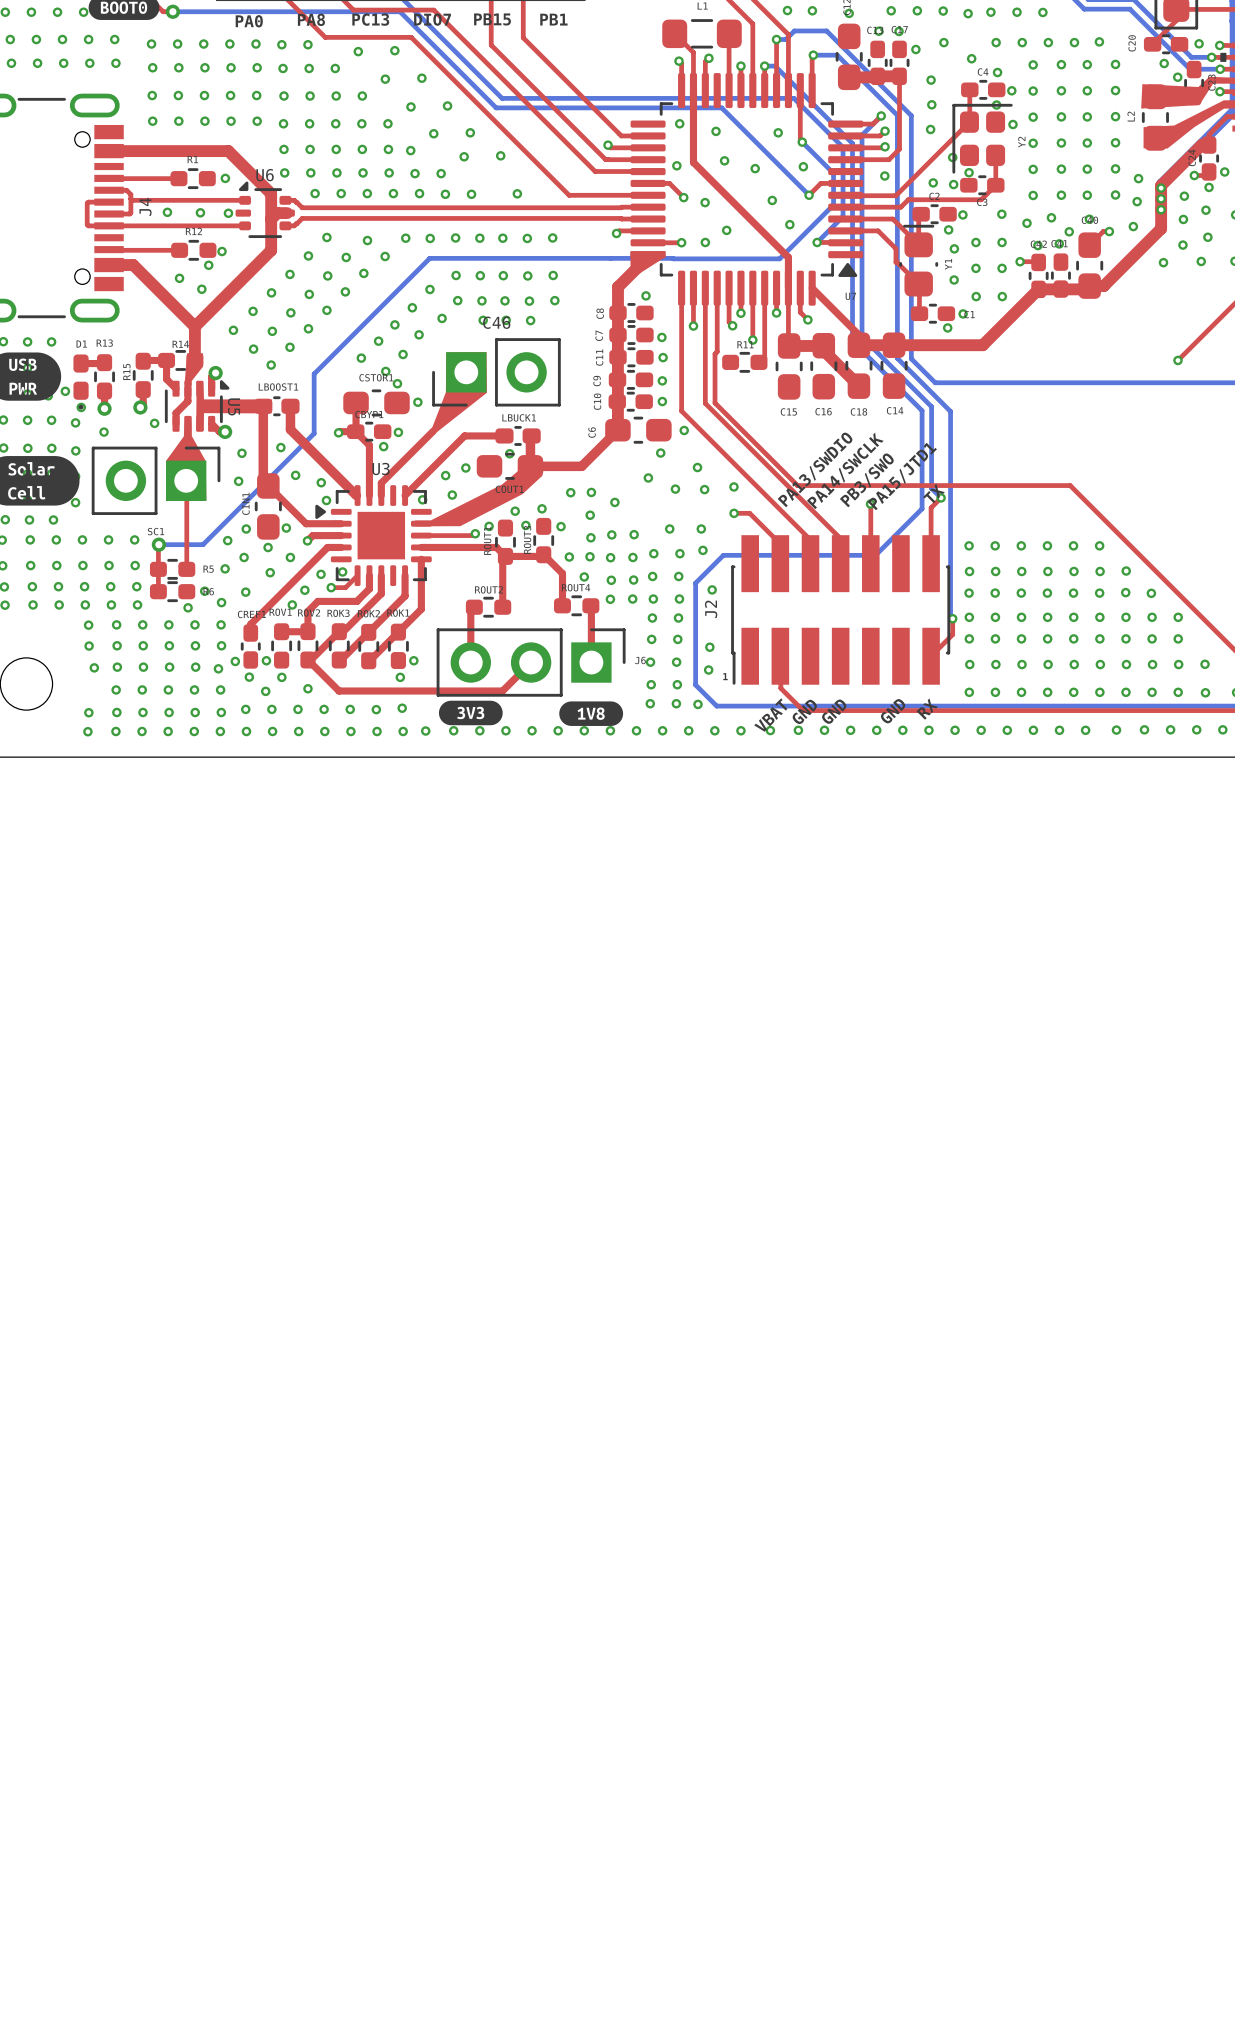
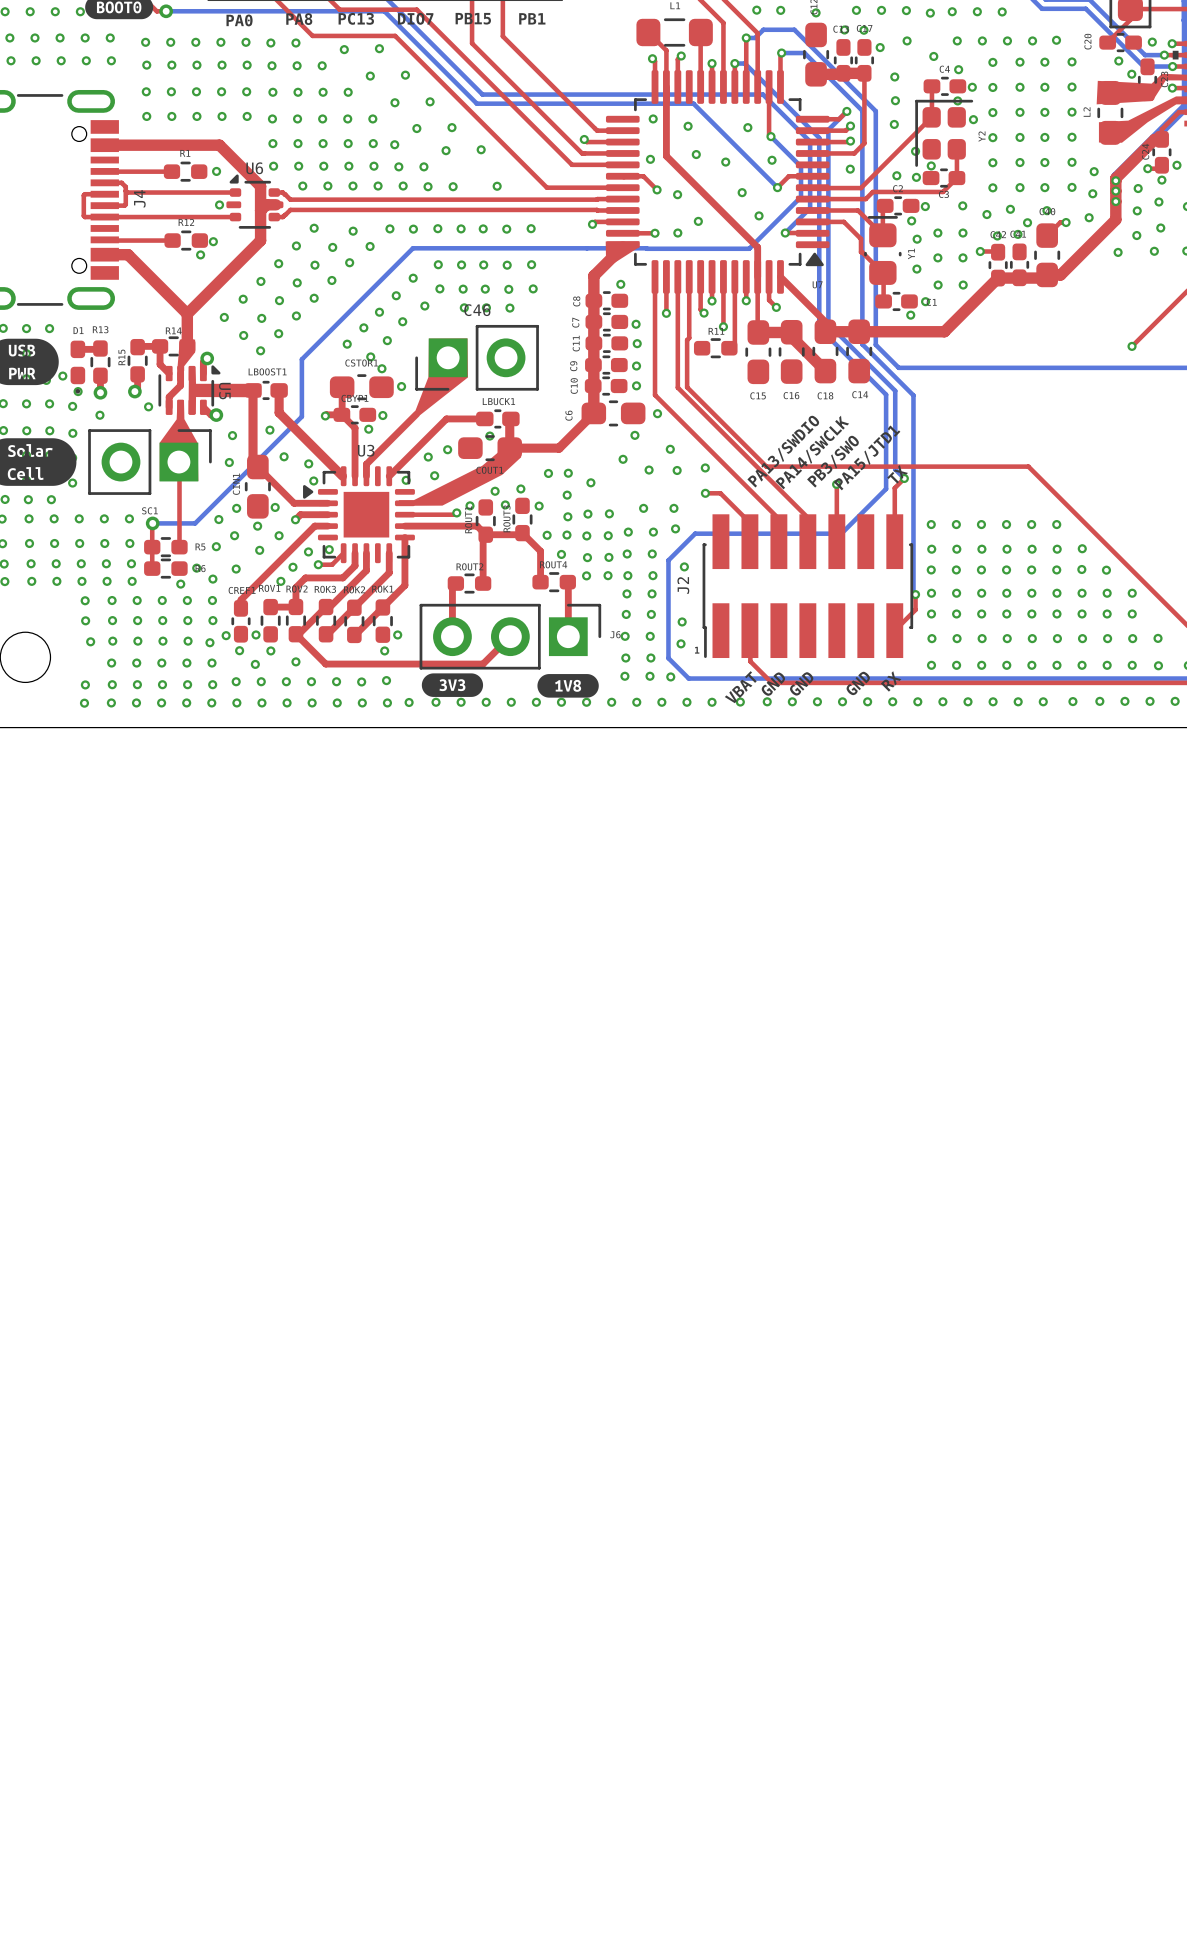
via: (167, 212) -> none
via: (200, 212) -> none
via: (179, 278) -> none
via: (201, 289) -> none

